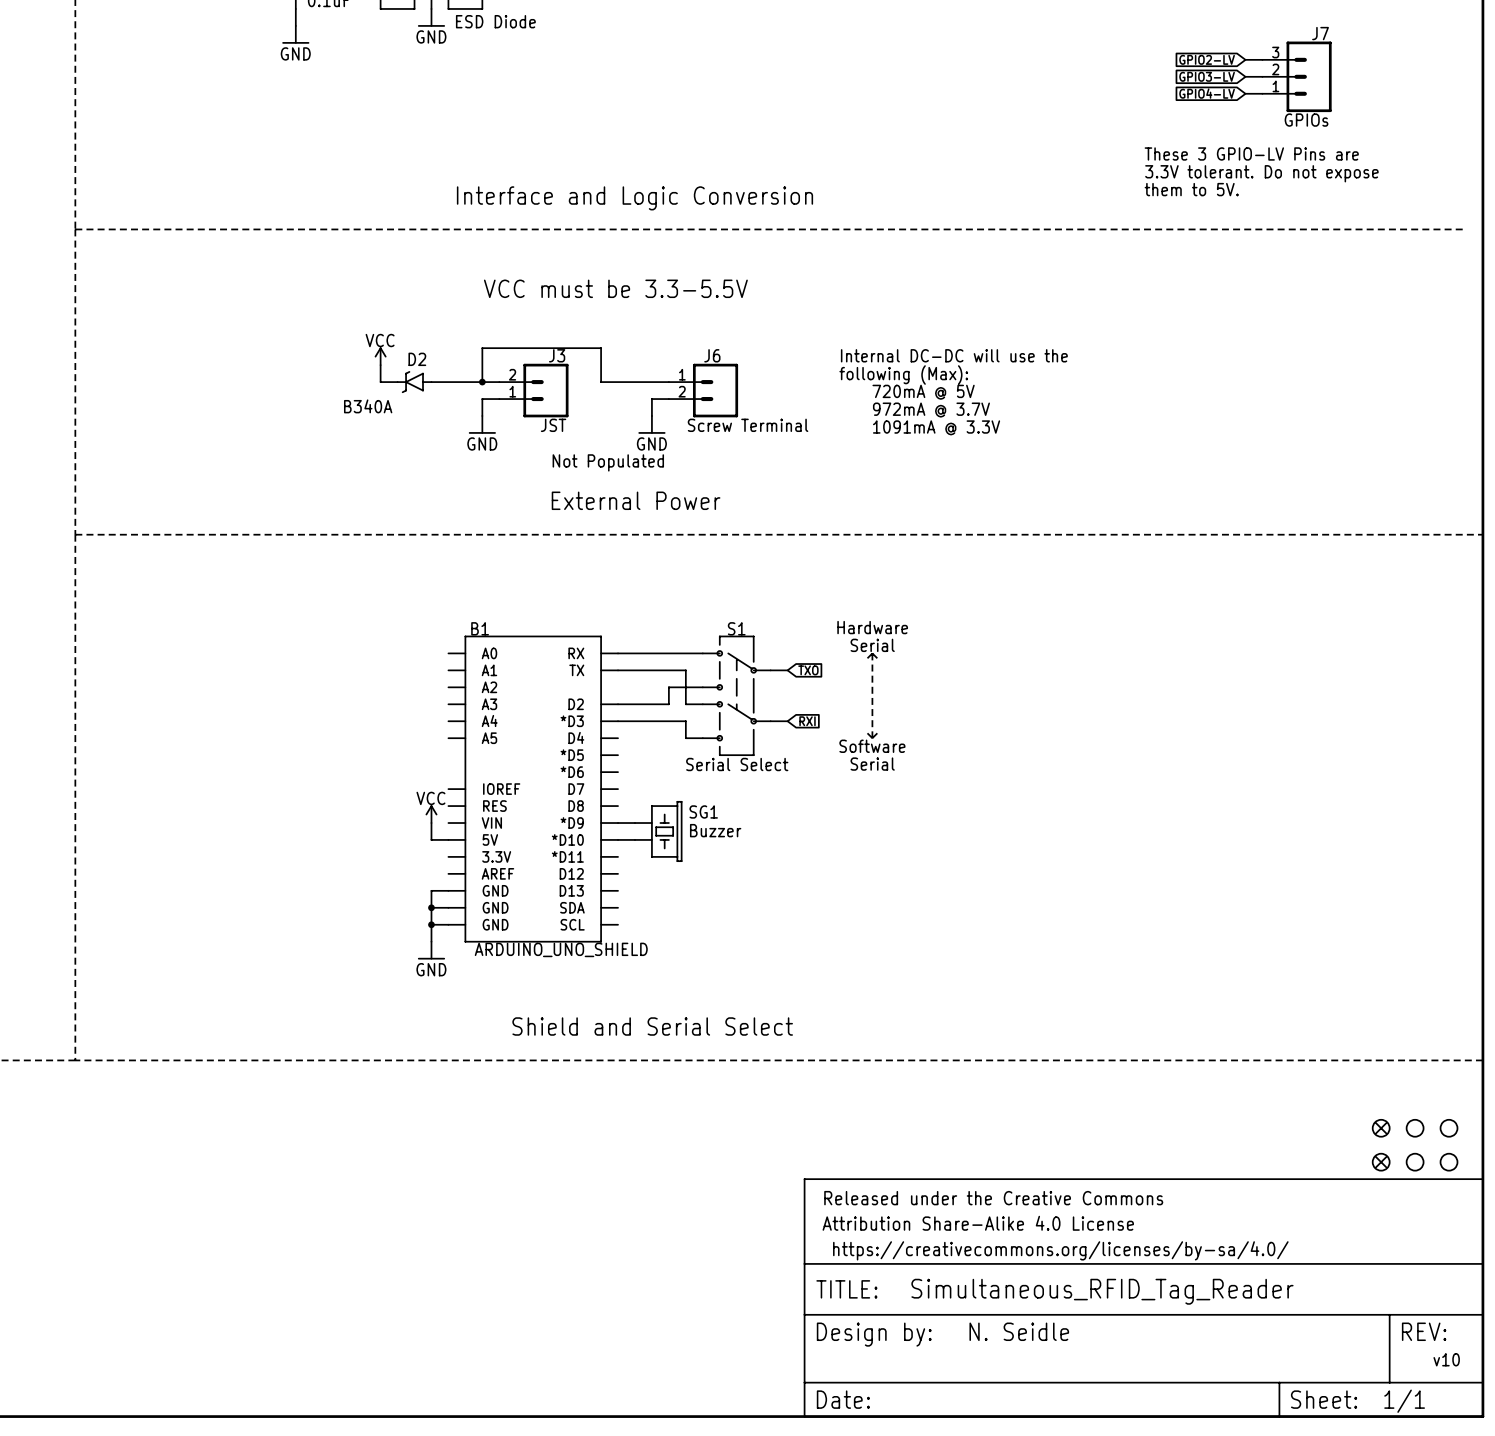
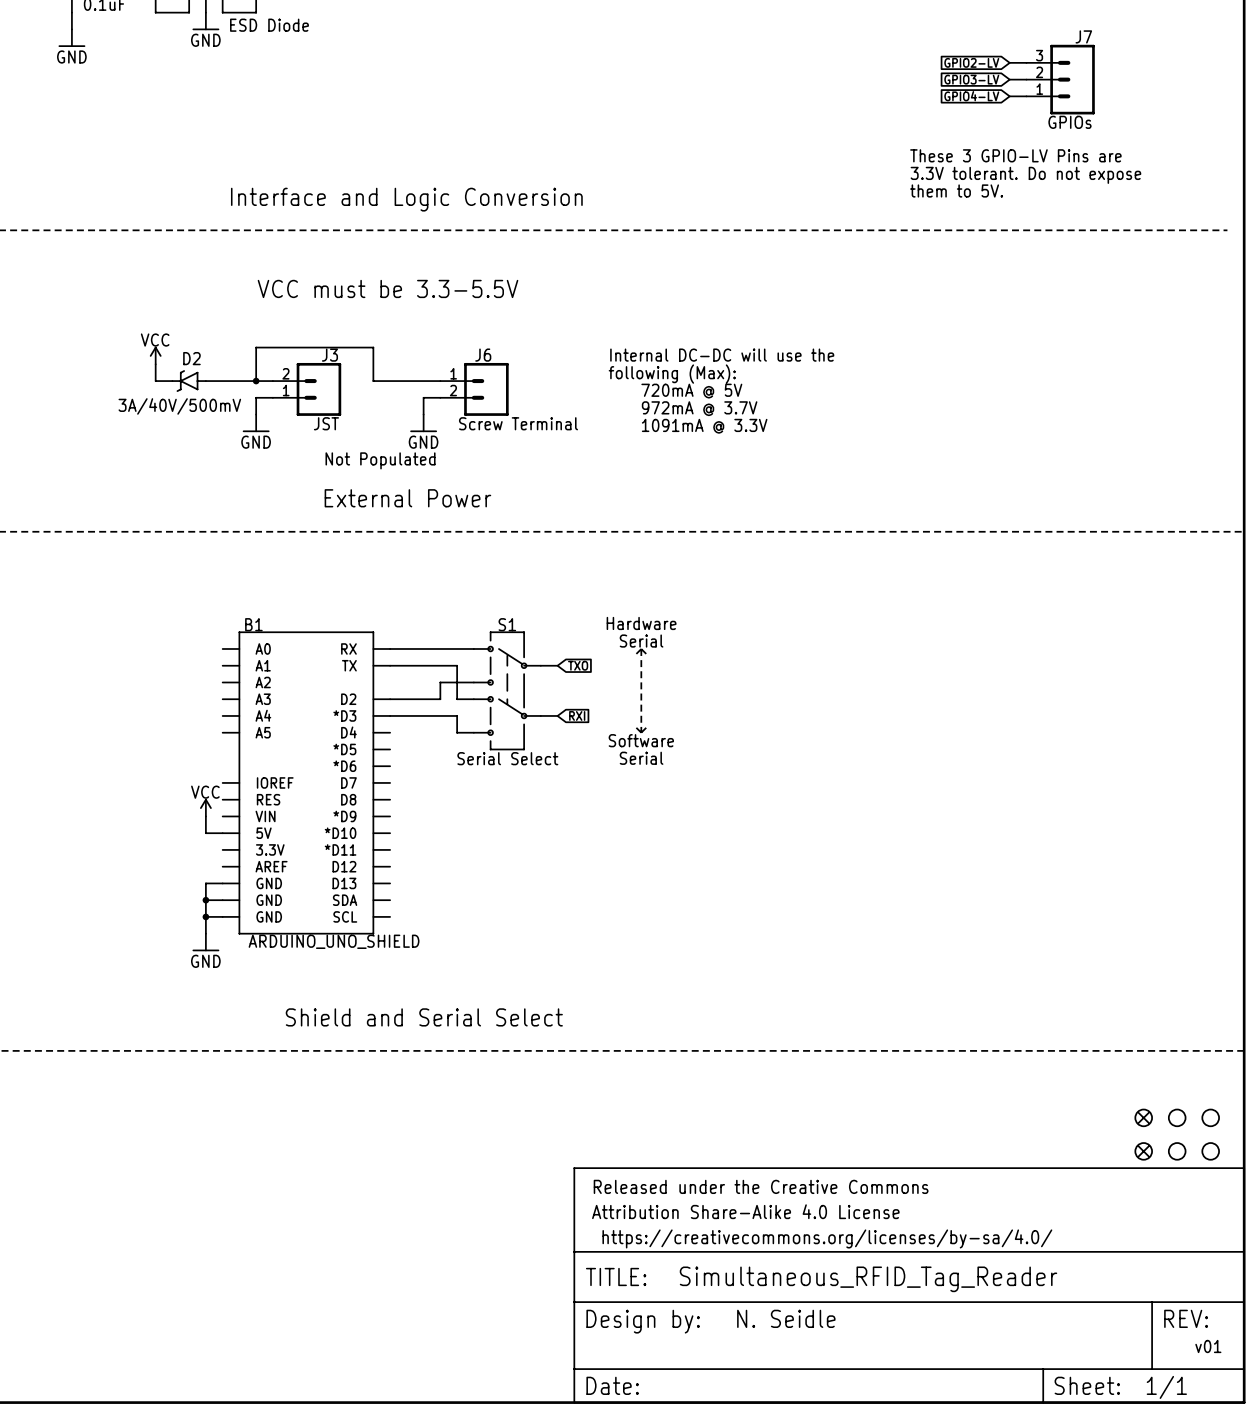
D2 value: B340A (368, 406) -> 3A/40V/500mV (179, 406)
wire: (618, 823) (634, 823) -> none
SG1: Buzzer (658, 831) -> none
wire: (618, 839) (634, 839) -> none
text: v10 (1446, 1359) -> v01 (1208, 1346)

